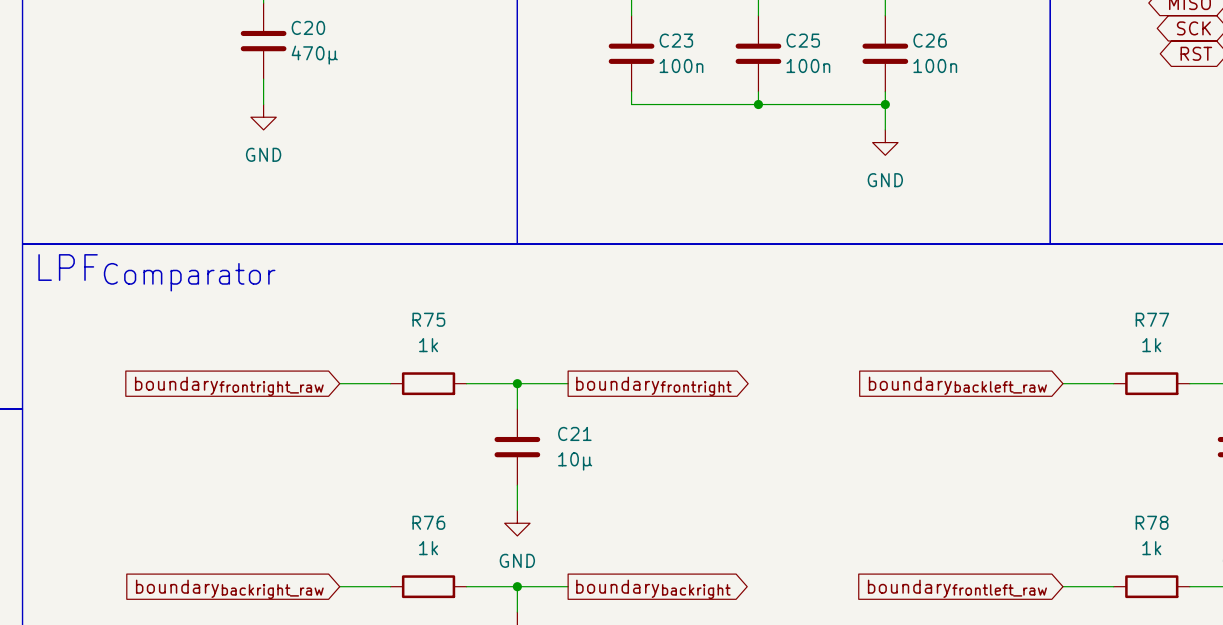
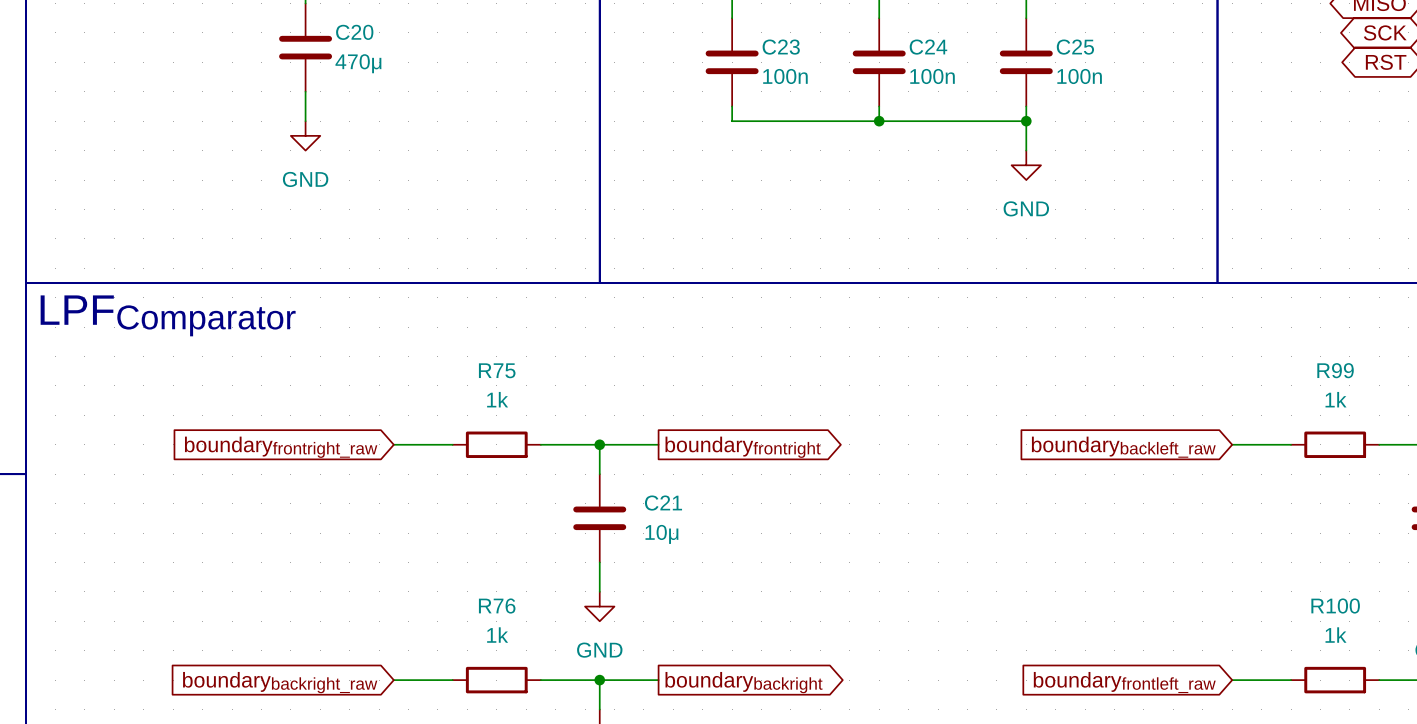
C25 name: C25 (803, 40) -> C24 (928, 47)
C26 name: C26 (930, 40) -> C25 (1075, 47)
R77 name: R77 (1152, 319) -> R99 (1335, 370)
R78 name: R78 (1152, 522) -> R100 (1335, 606)

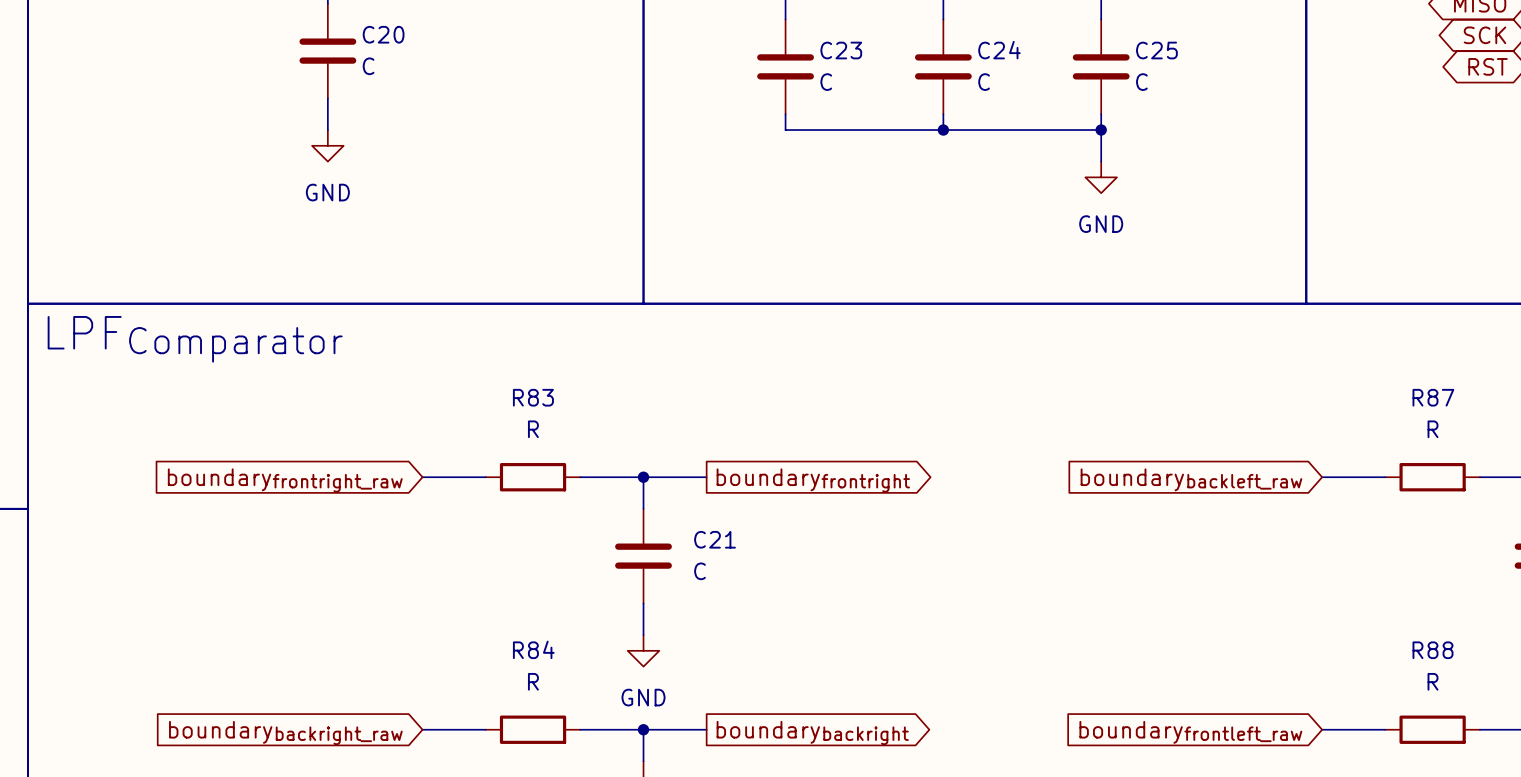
C20 value: 470μ (358, 63) -> C (368, 66)
C23 value: 100n (785, 76) -> C (826, 82)
C24 value: 100n (932, 76) -> C (984, 82)
C25 value: 100n (1079, 76) -> C (1141, 82)
R75 name: R75 (497, 370) -> R83 (533, 397)
R99 name: R99 (1335, 370) -> R87 (1433, 397)
R75 value: 1k (497, 399) -> R (533, 429)
R99 value: 1k (1336, 399) -> R (1433, 429)
C21 value: 10μ (661, 534) -> C (700, 571)
R76 name: R76 (497, 606) -> R84 (533, 649)
R100 name: R100 (1335, 606) -> R88 (1433, 650)
R76 value: 1k (497, 635) -> R (533, 681)
R100 value: 1k (1336, 635) -> R (1433, 681)

